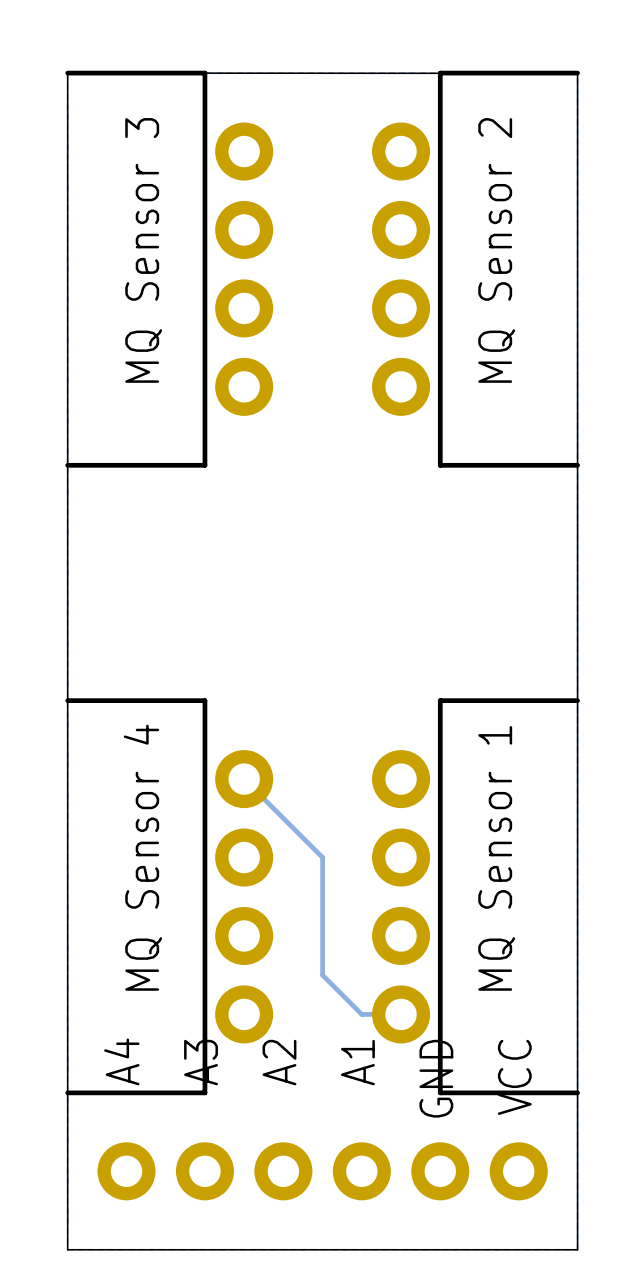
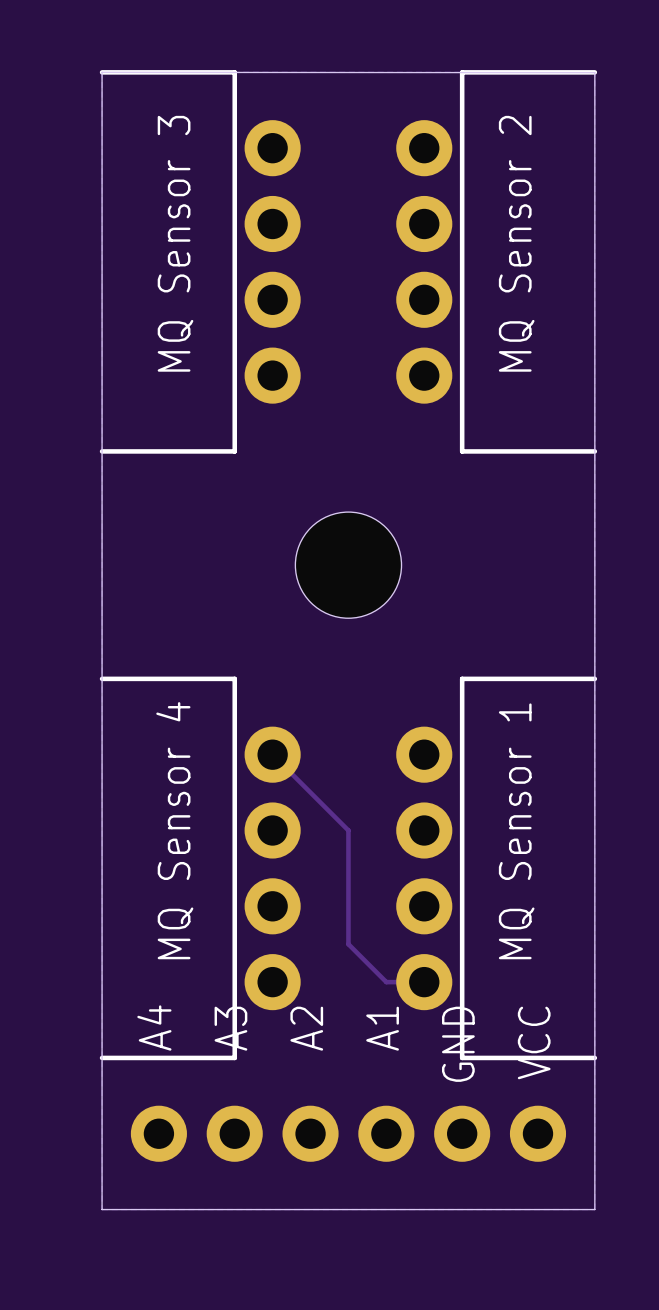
hole: none -> (348, 565)

